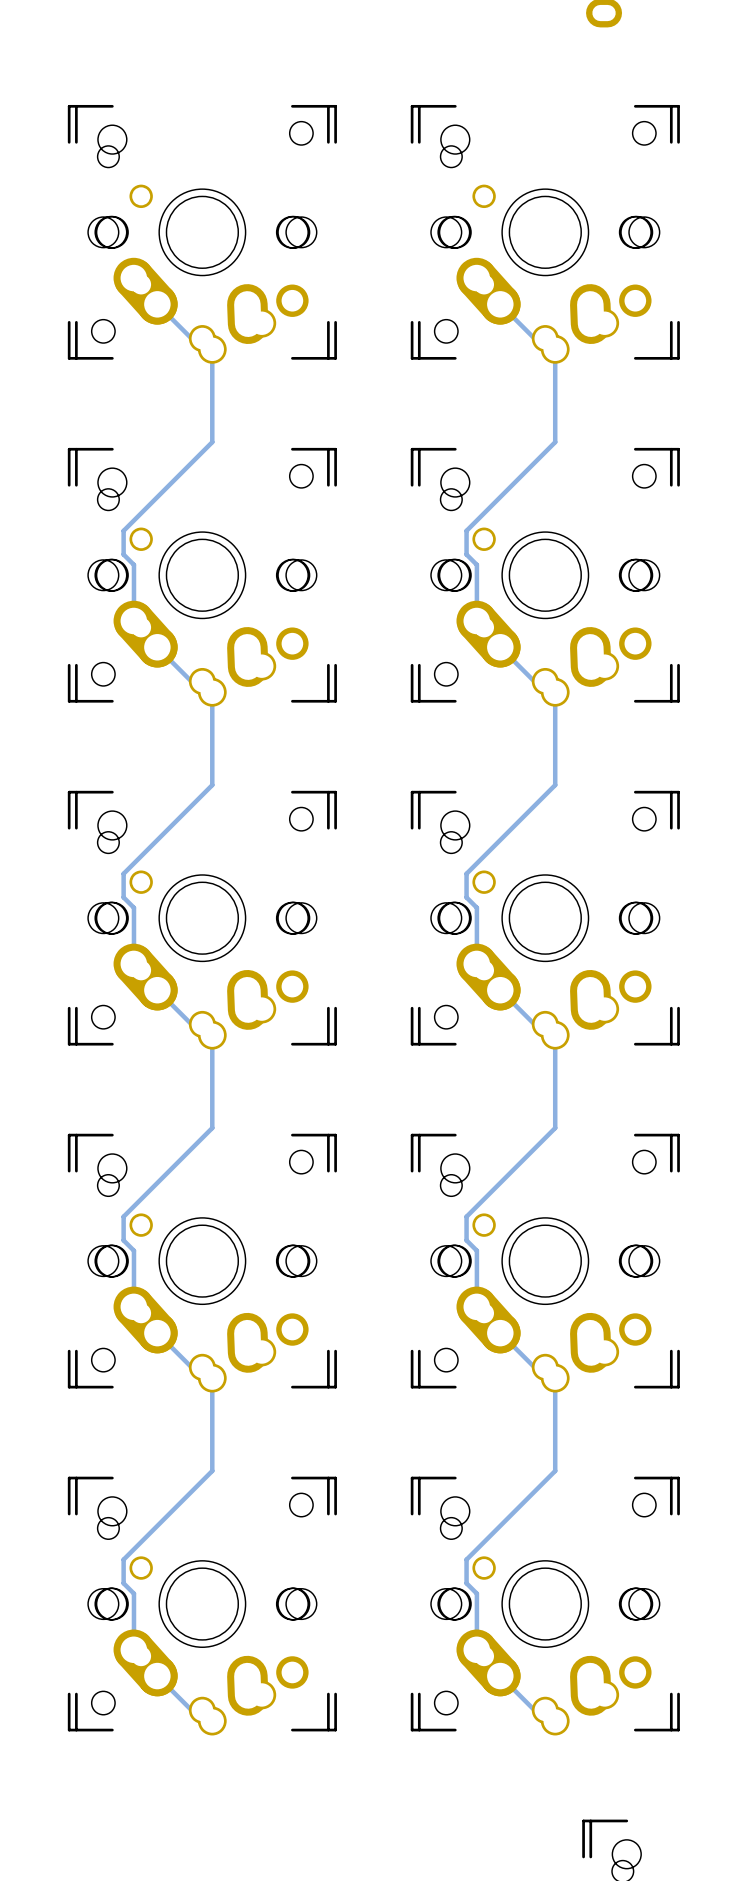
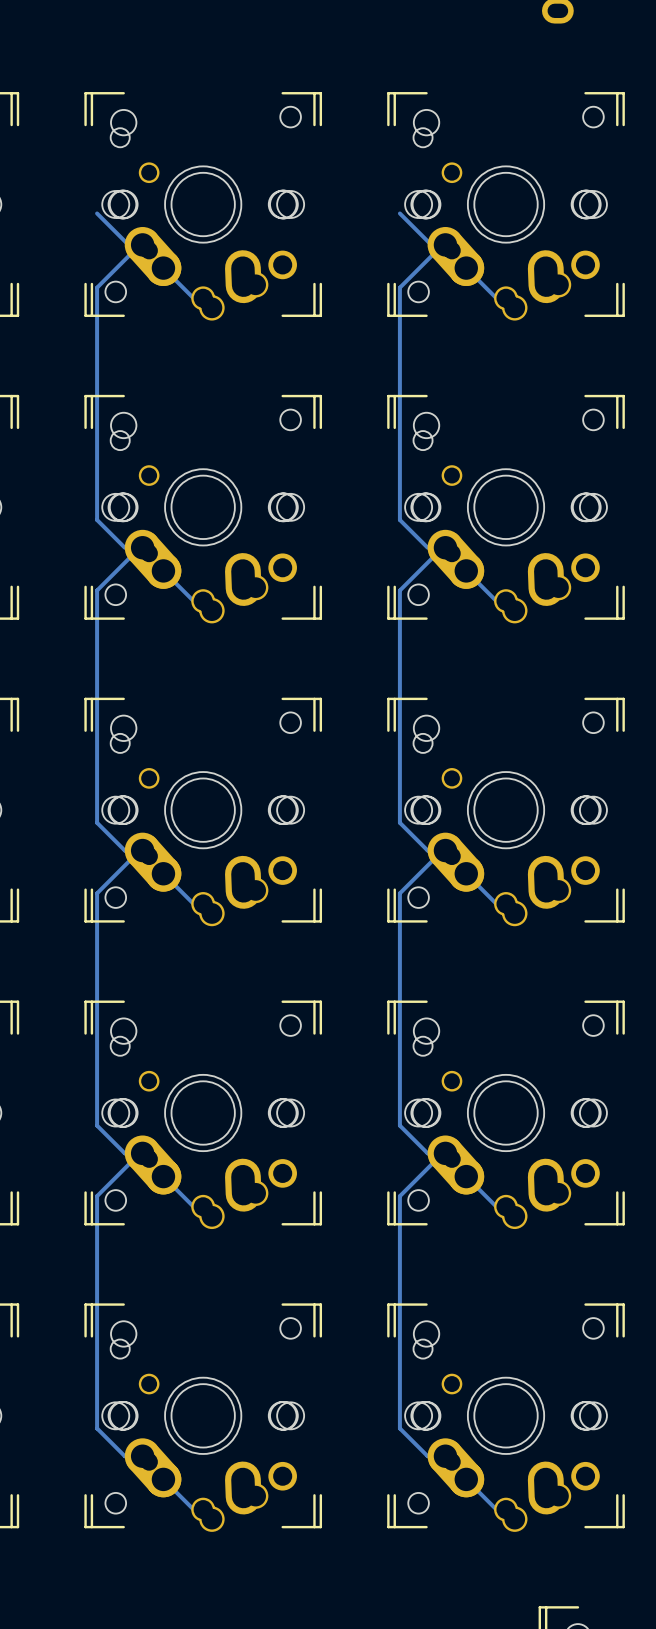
track: none -> (97, 213) (126, 242)
track: none -> (399, 213) (429, 242)
track: none -> (139, 244) (97, 287) (97, 519) (124, 547)
track: none -> (442, 244) (399, 287) (399, 519) (427, 547)
track: (212, 349) (212, 442) (123, 530) (123, 554) (133, 564) (133, 623) (191, 681) -> none
track: (555, 349) (555, 442) (466, 530) (466, 554) (476, 564) (476, 623) (534, 681) -> none
track: (212, 692) (212, 785) (123, 873) (123, 897) (133, 907) (133, 963) -> (139, 547) (97, 590) (97, 822) (124, 850) (142, 850)
track: (555, 692) (555, 785) (466, 873) (466, 897) (476, 907) (476, 963) -> (442, 547) (399, 590) (399, 822) (427, 850) (445, 850)
track: (212, 1035) (212, 1128) (123, 1216) (123, 1240) (133, 1250) (133, 1306) -> (139, 850) (97, 893) (97, 1125) (124, 1153) (142, 1153)
track: (555, 1035) (555, 1128) (466, 1216) (466, 1240) (476, 1250) (476, 1306) -> (442, 850) (399, 893) (399, 1125) (427, 1153) (445, 1153)
track: (212, 1378) (212, 1470) (123, 1559) (123, 1583) (133, 1593) (133, 1649) -> (139, 1153) (97, 1196) (97, 1428) (124, 1456) (142, 1456)
track: (555, 1378) (555, 1470) (466, 1559) (466, 1583) (476, 1593) (476, 1649) -> (442, 1153) (399, 1196) (399, 1428) (427, 1456) (445, 1456)

